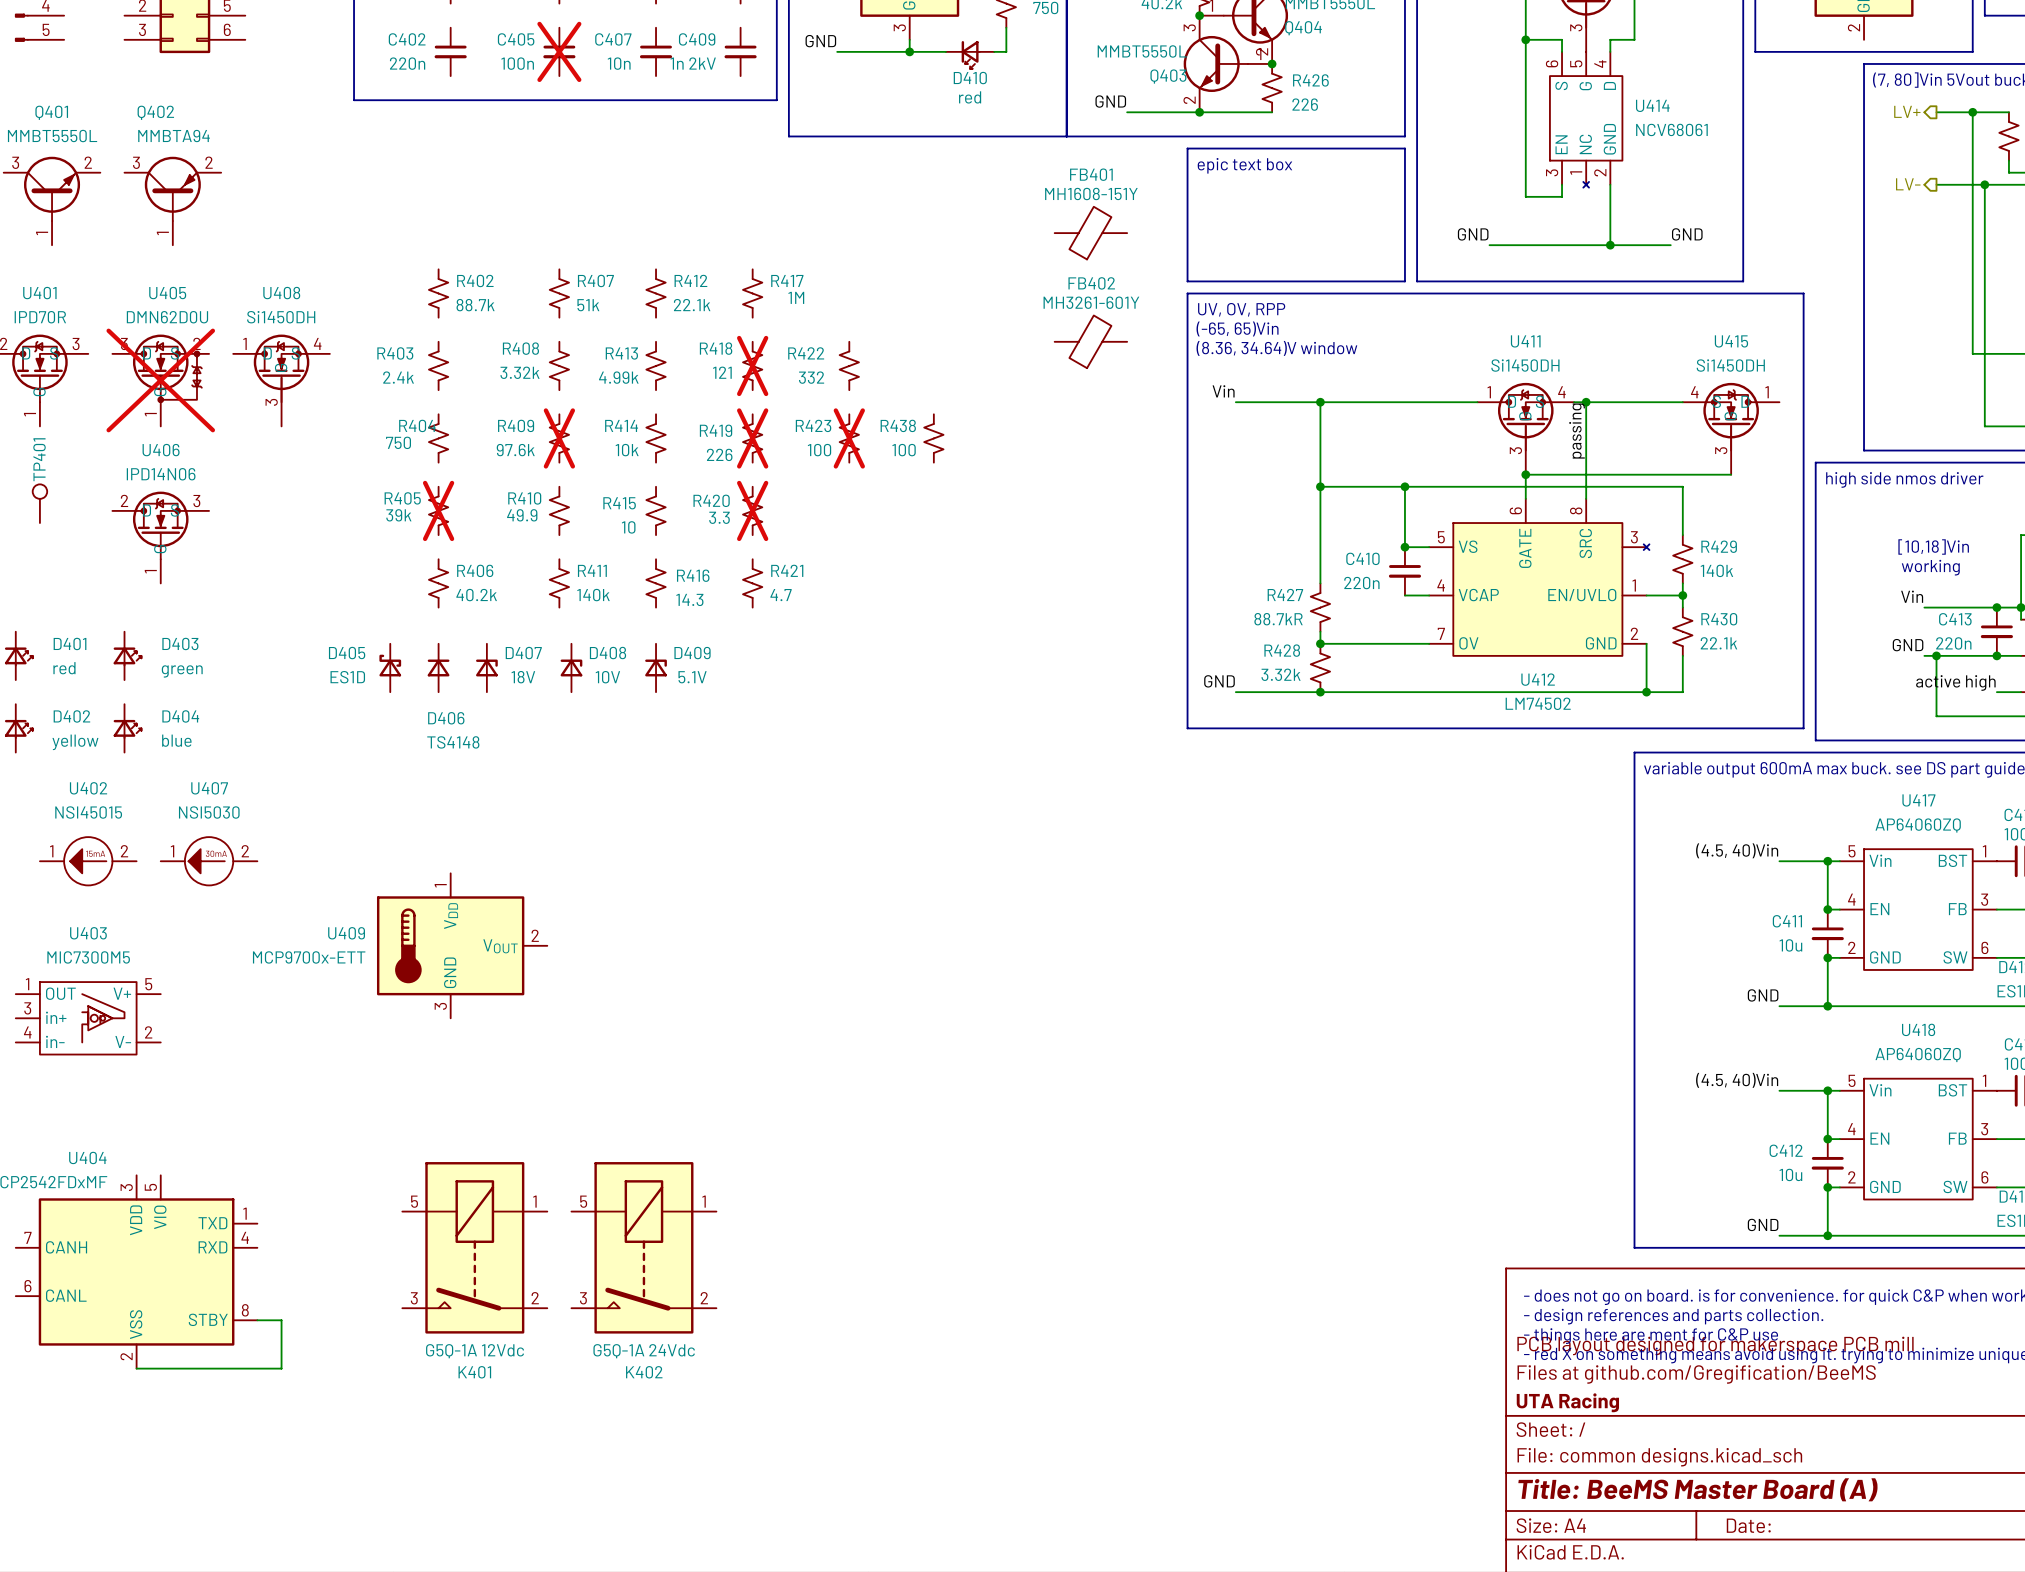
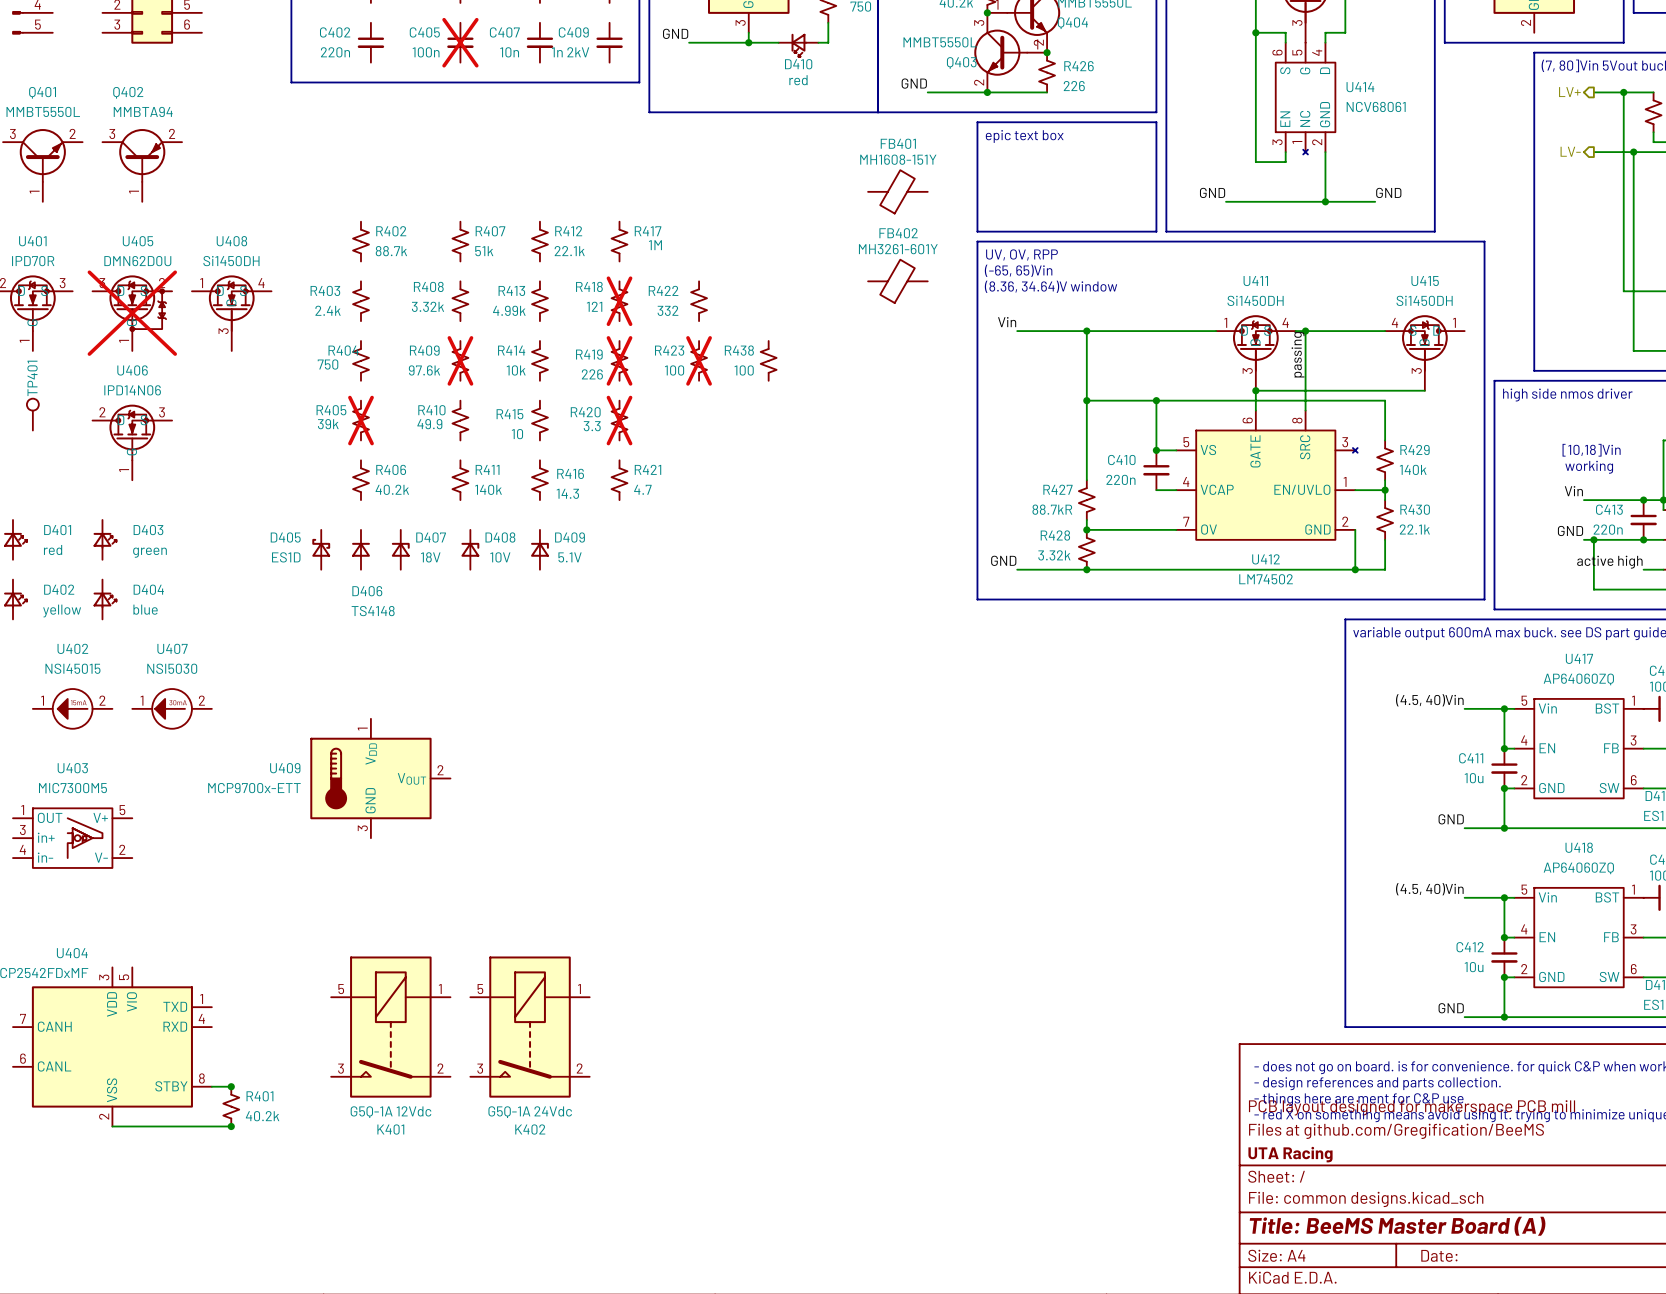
junction: none -> (231, 1086)
R401: none -> 40.2k (231, 1106)
junction: none -> (231, 1126)

